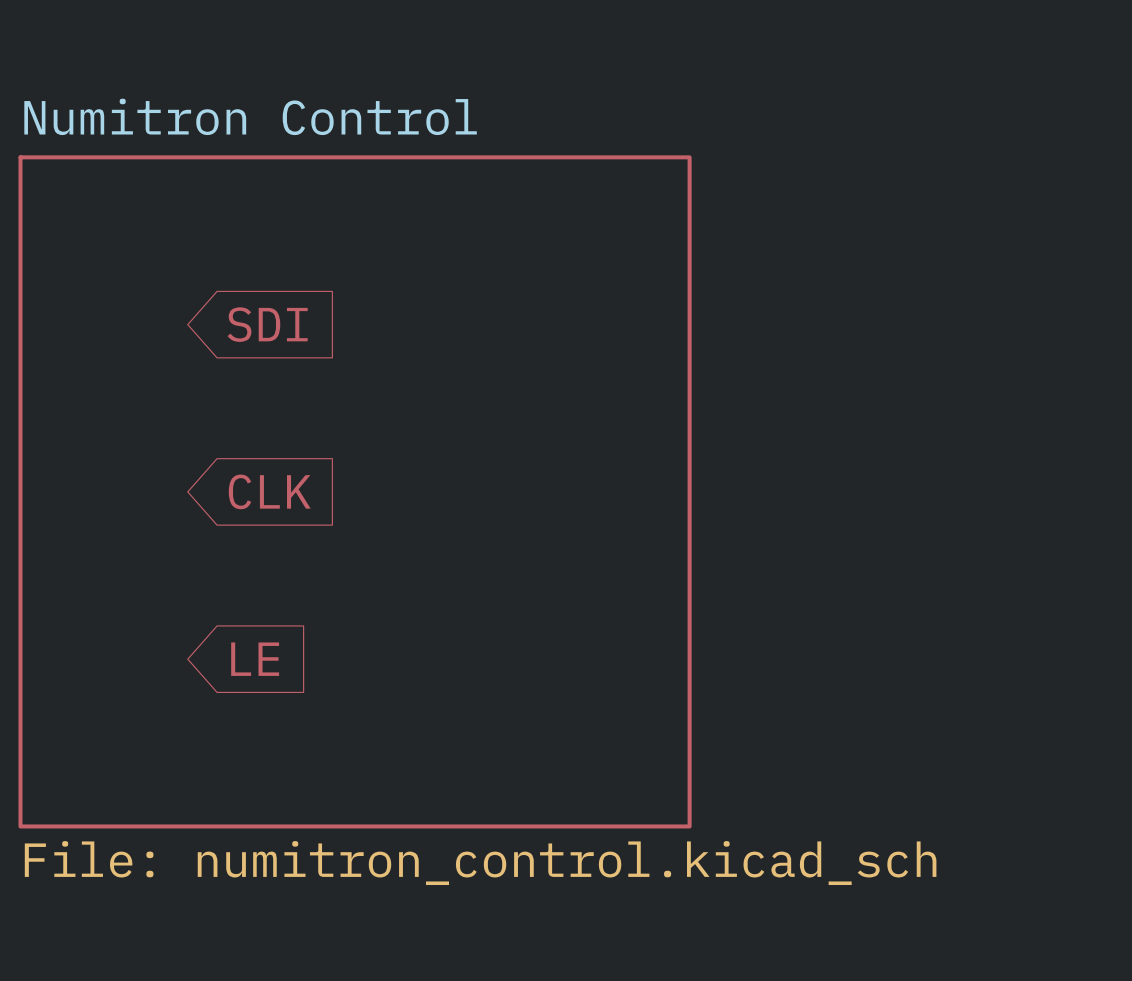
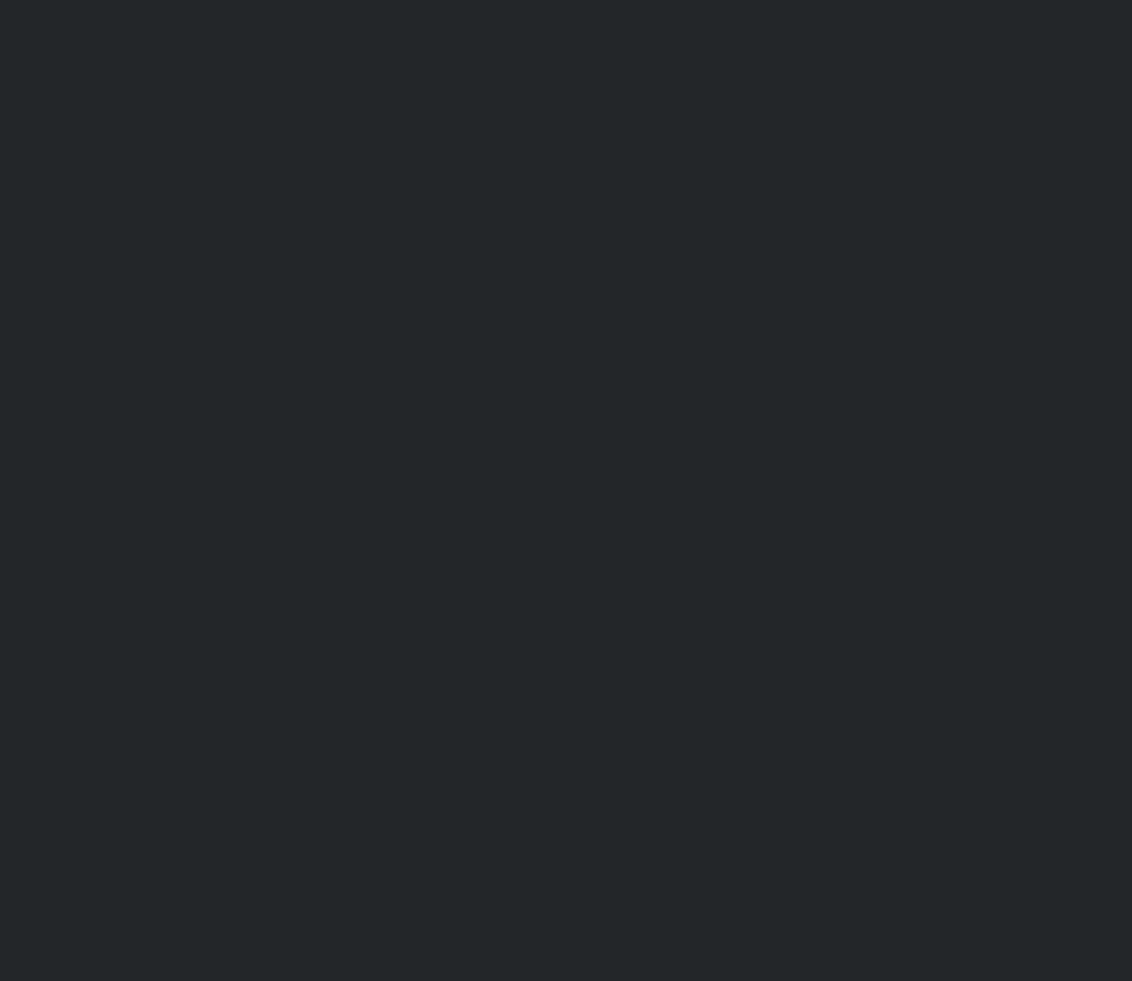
global label: SDI (267, 324) -> none
global label: CLK (269, 491) -> none
sheet Numitron Control: File: numitron_control.kicad_sch (355, 491) -> none
global label: LE (255, 659) -> none

